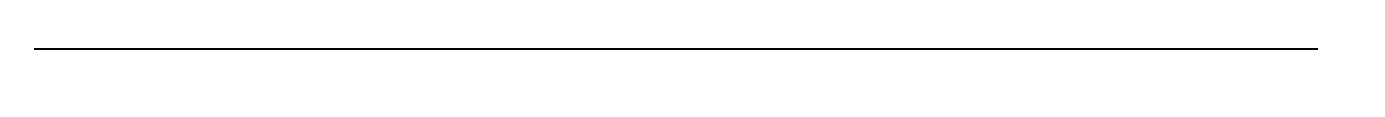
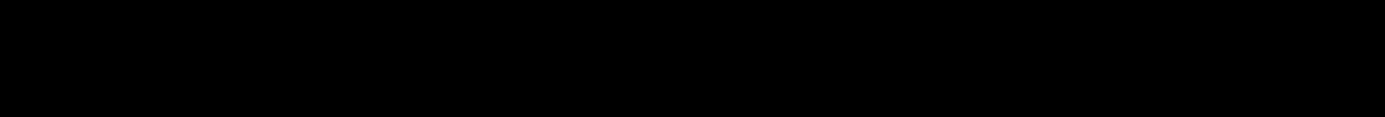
board edge: (1317, 48) (34, 48) (1317, 48) -> none

